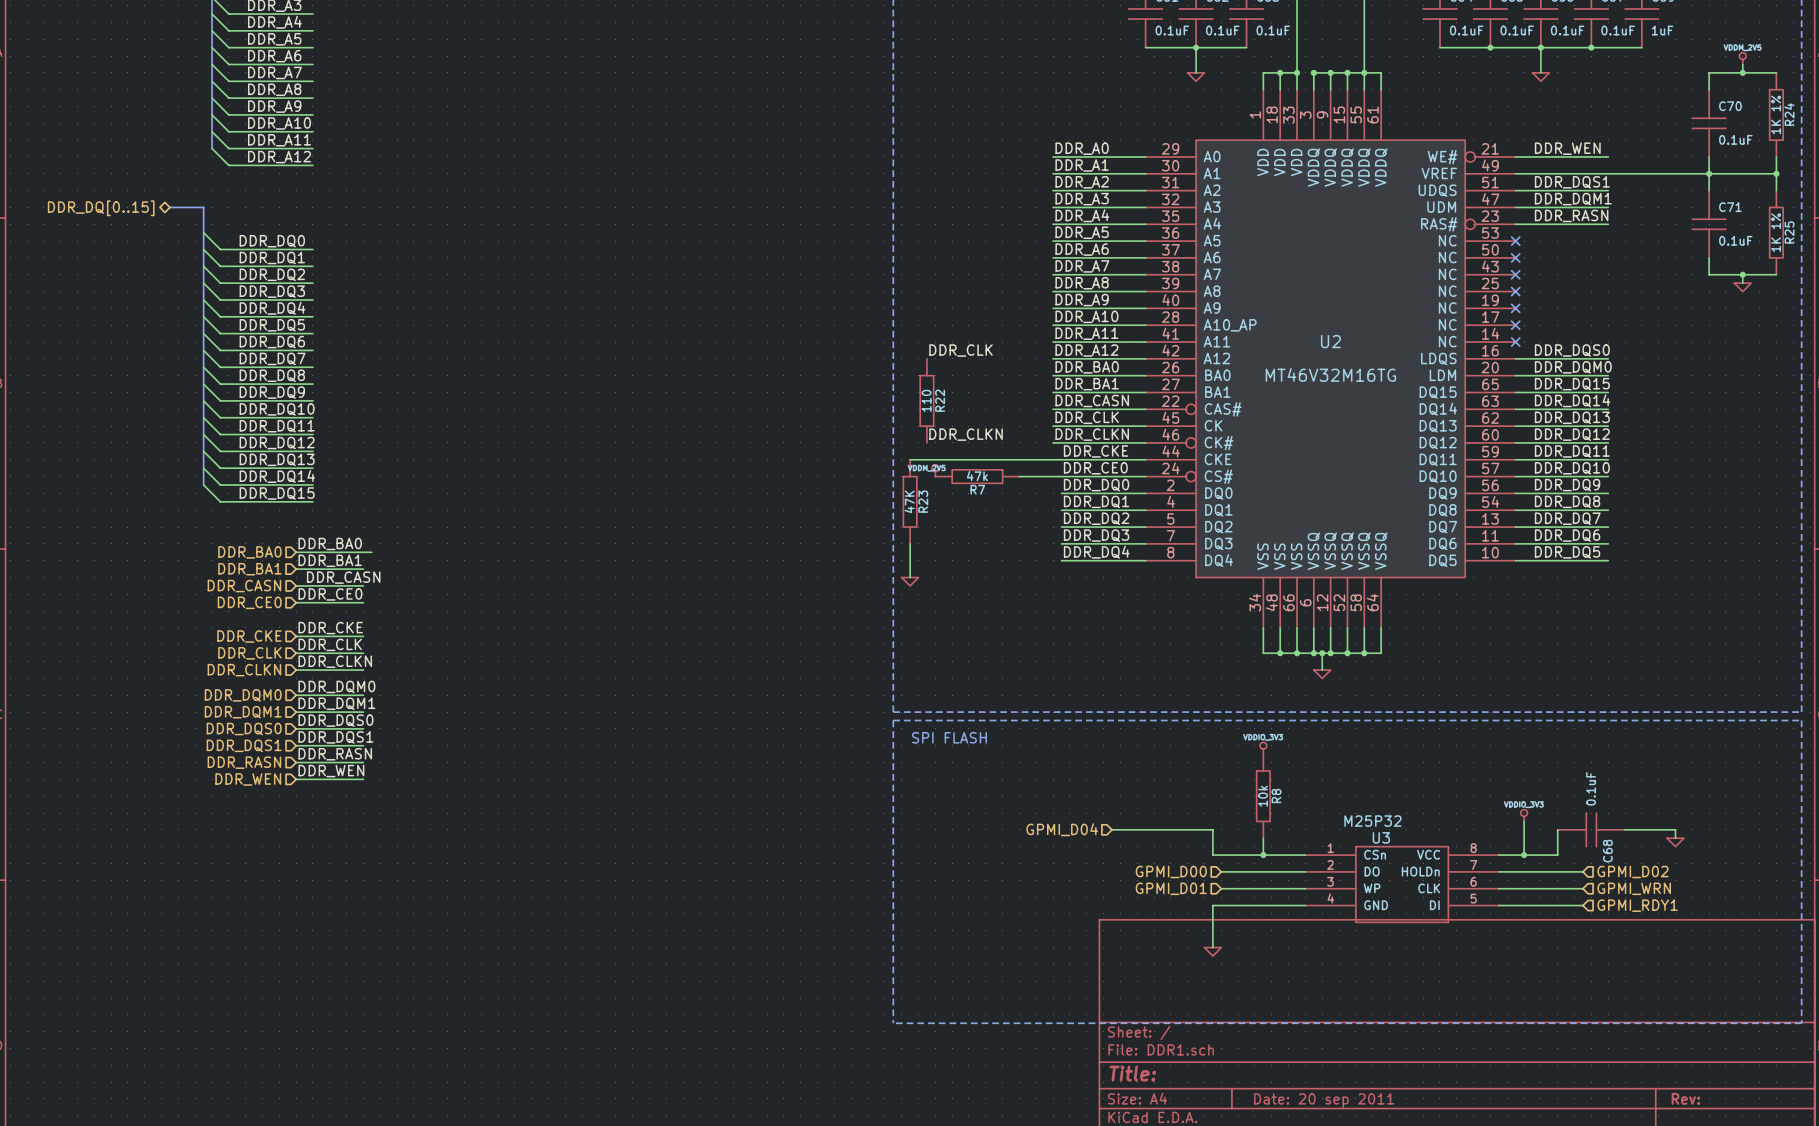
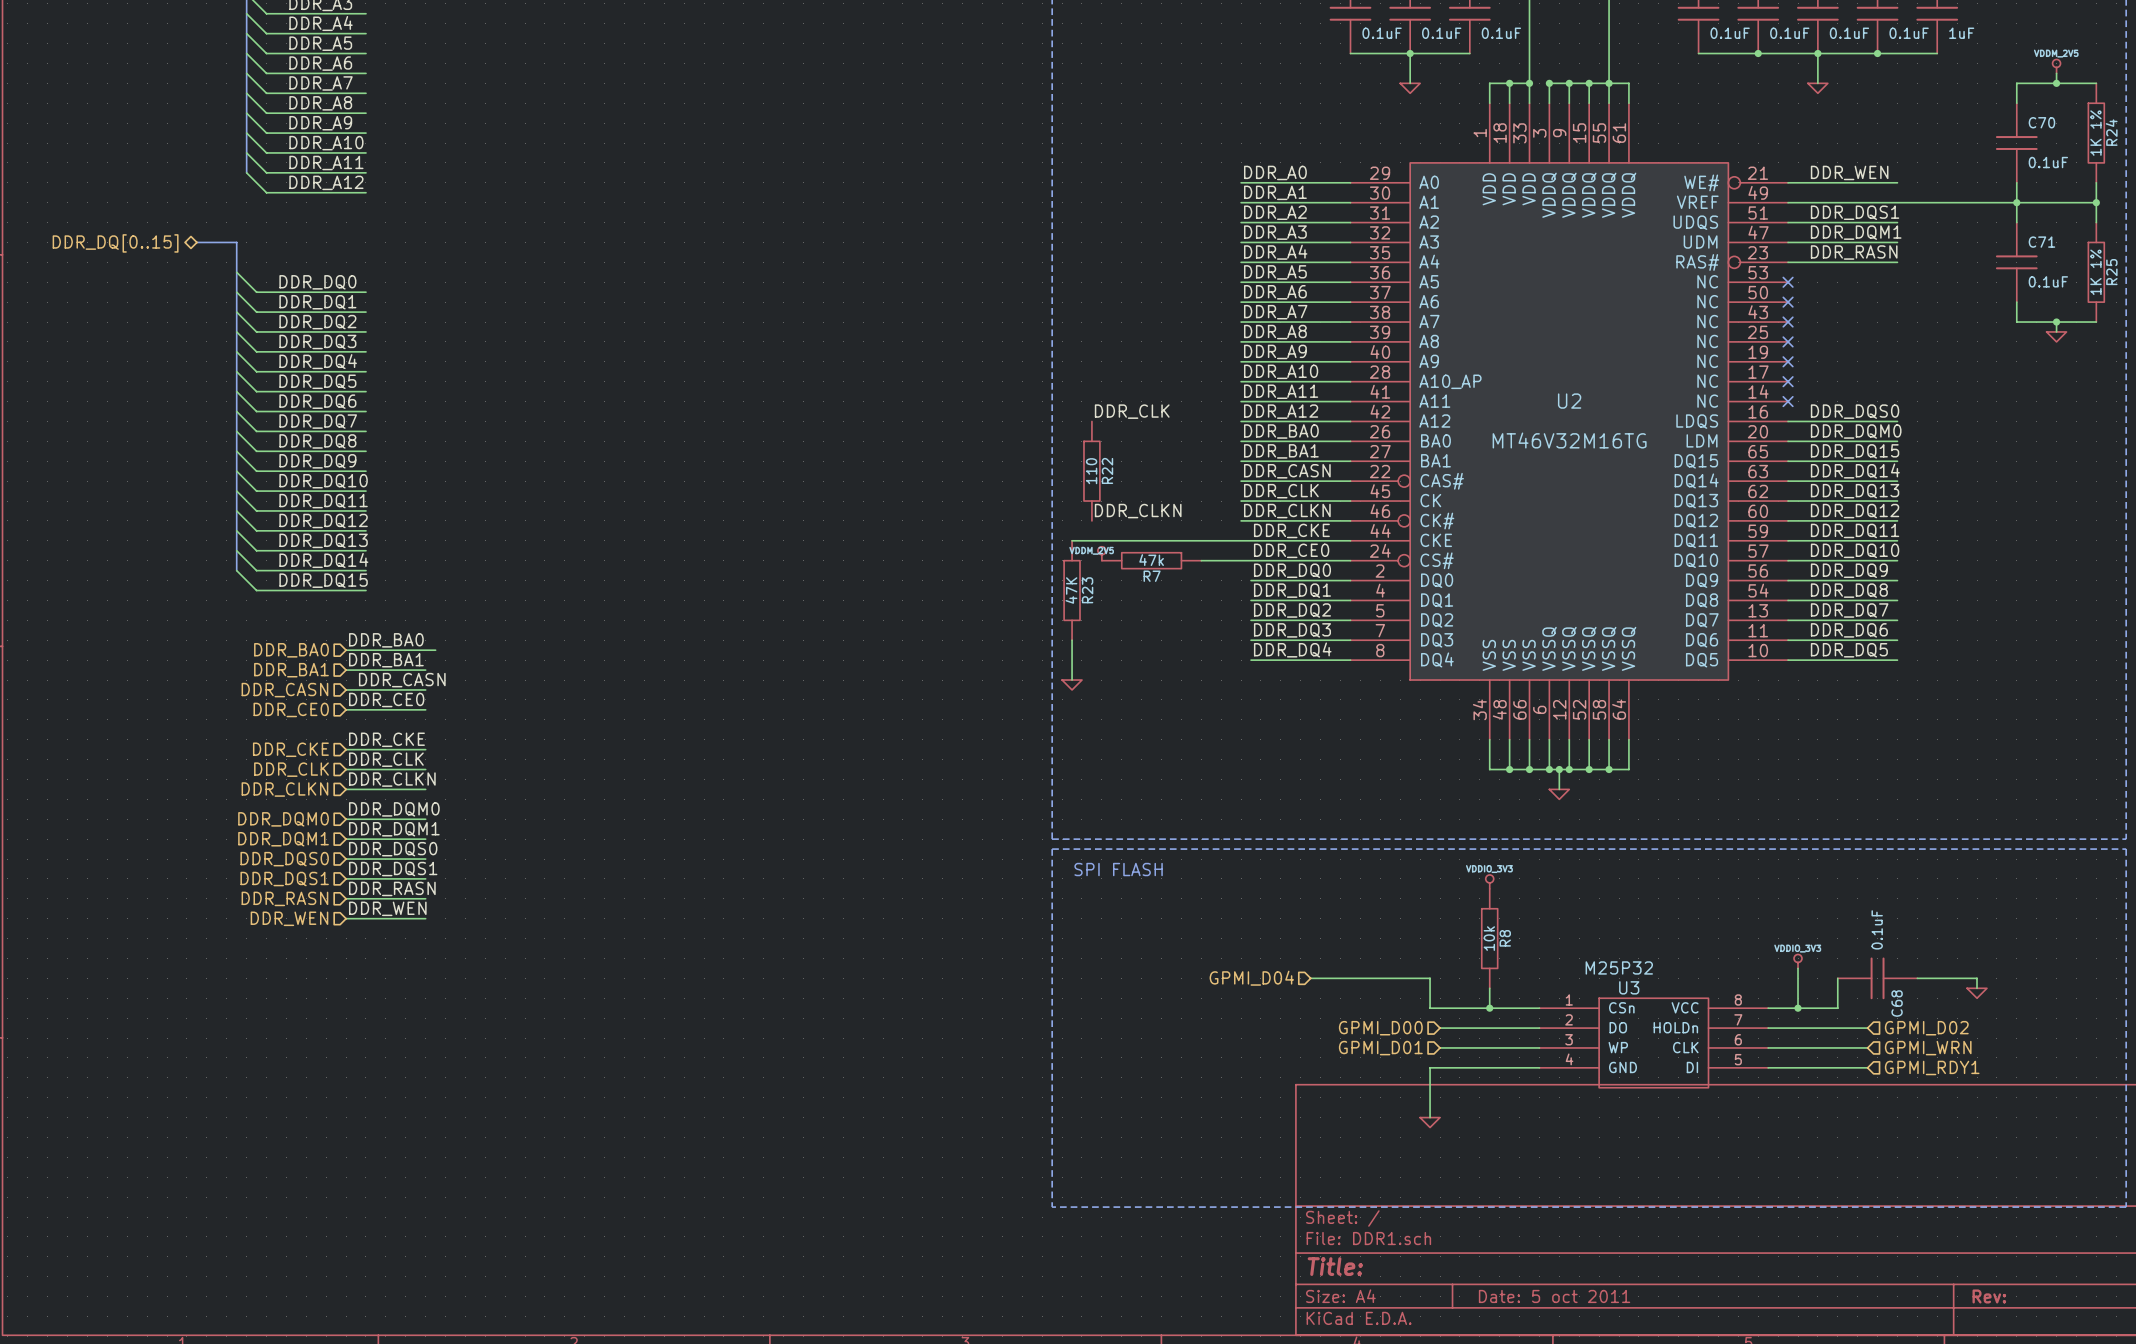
title block: Date: 20 sep 2011 (1324, 1100) -> Date: 5 oct 2011 (1554, 1296)

